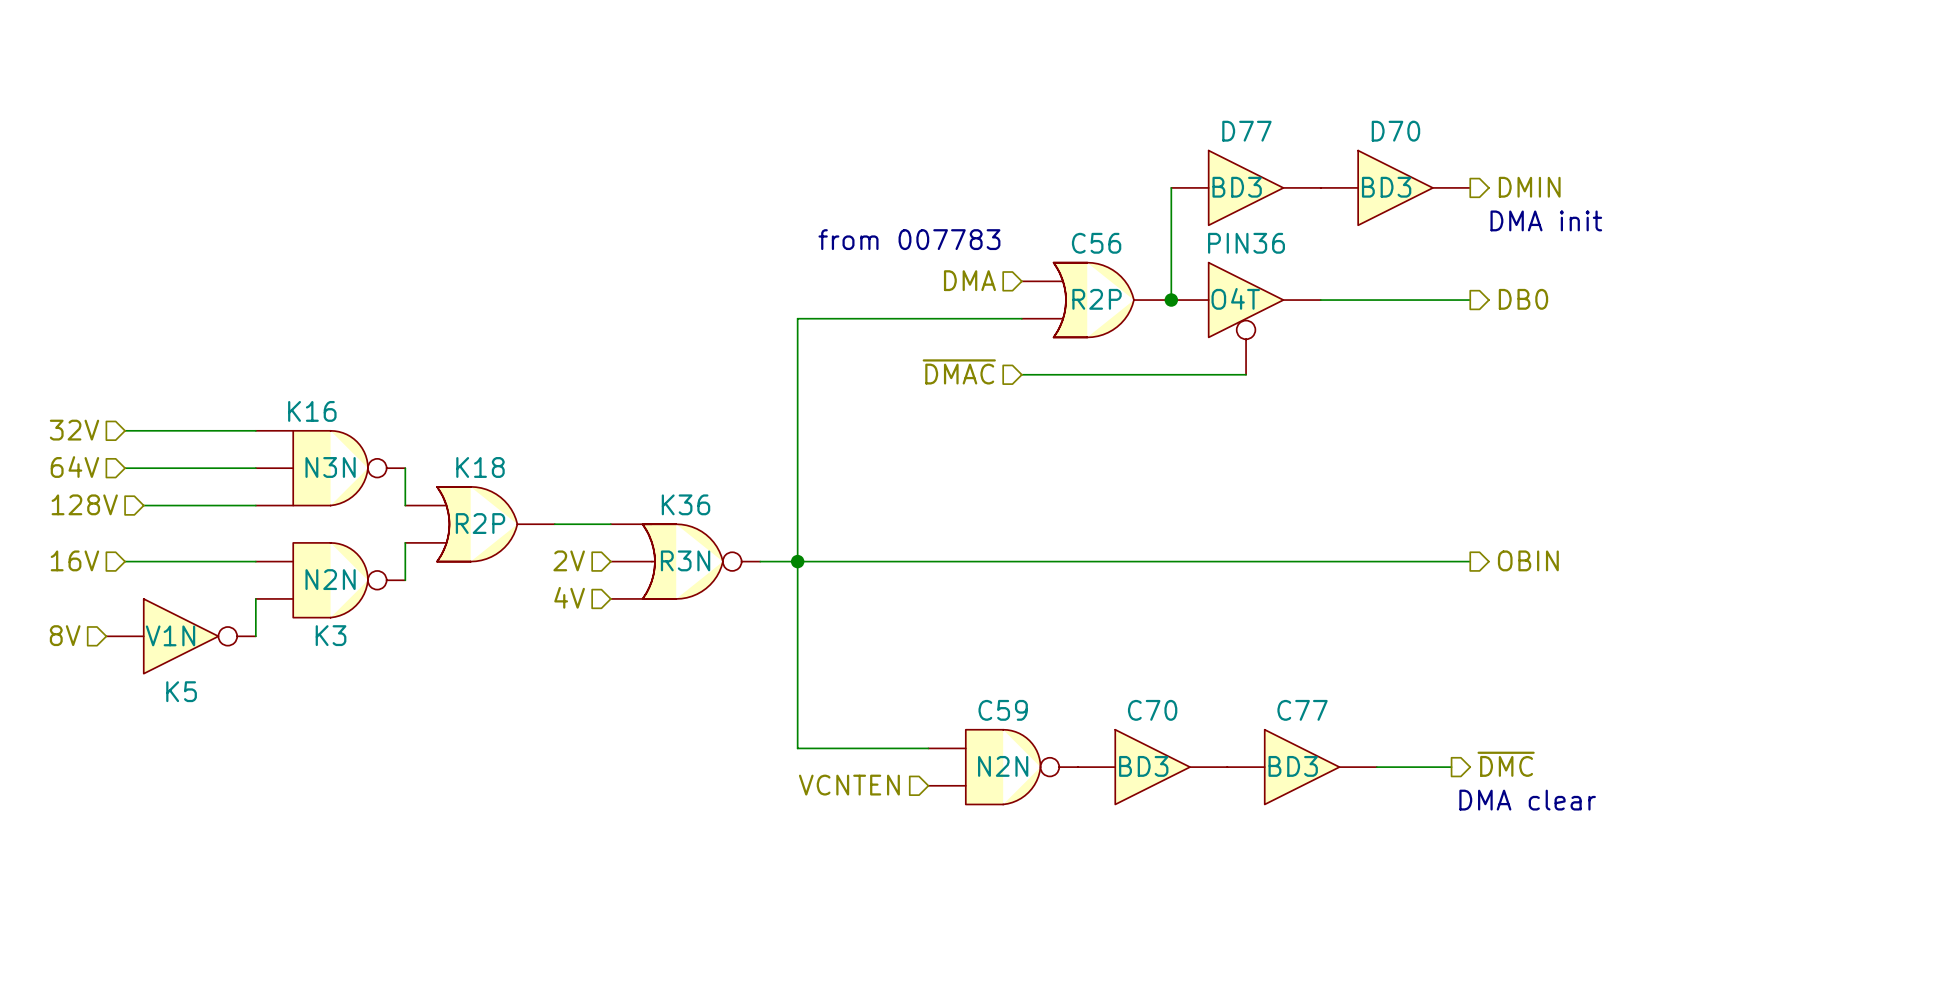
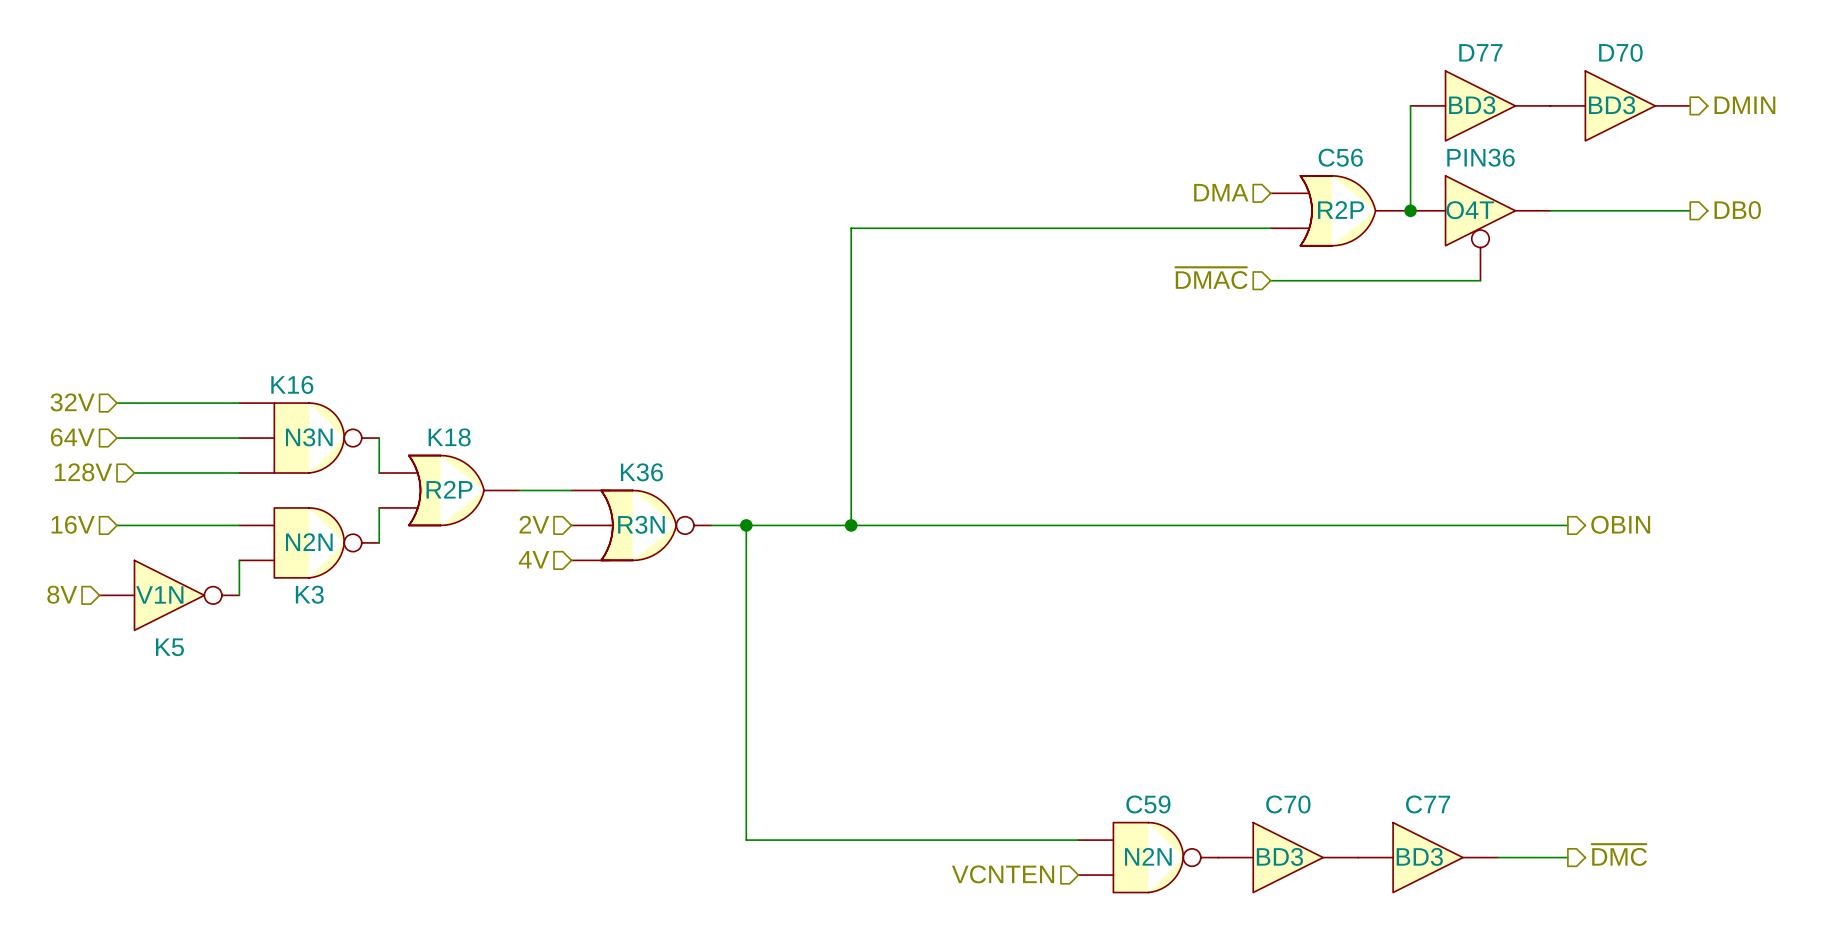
wire: (1171, 187) (1171, 300) -> (1410, 105) (1410, 210)
D77 position: (1246, 187) -> (1480, 105)
D70 position: (1395, 187) -> (1620, 105)
hierarchical label position: DMIN (1529, 187) -> DMIN (1744, 105)
text: DMA init (1546, 220) -> none
junction: none -> (1410, 210)
wire: none -> (1550, 210) (1690, 210)
text: from 007783 (909, 239) -> none
wire: none -> (1270, 228) (851, 228) (851, 525)
hierarchical label position: DMA (969, 280) -> DMA (1221, 192)
hierarchical label position: DB0 (1523, 299) -> DB0 (1737, 210)
C56 position: (1096, 300) -> (1340, 210)
junction: (1171, 300) -> none
wire: (1320, 300) (1358, 300) -> none
wire: none -> (1375, 280) (1480, 280)
wire: (1021, 318) (797, 318) (797, 561) -> none
PIN36 position: (1246, 318) -> (1480, 228)
hierarchical label position: ~{DMAC} (959, 371) -> ~{DMAC} (1211, 278)
wire: (1021, 374) (1246, 374) -> none
hierarchical label position: OBIN (1528, 560) -> OBIN (1620, 524)
junction: none -> (851, 525)
wire: none -> (1375, 525) (1567, 525)
wire: (797, 748) (928, 748) -> (746, 700) (746, 840) (1078, 840)
hierarchical label position: ~{DMC} (1506, 764) -> ~{DMC} (1619, 855)
C59 position: (1003, 767) -> (1148, 857)
C70 position: (1152, 767) -> (1288, 857)
C77 position: (1302, 767) -> (1428, 857)
wire: (1376, 767) (1451, 767) -> (1497, 857) (1567, 857)
hierarchical label position: VCNTEN (849, 785) -> VCNTEN (1003, 874)
text: DMA clear (1527, 800) -> none

